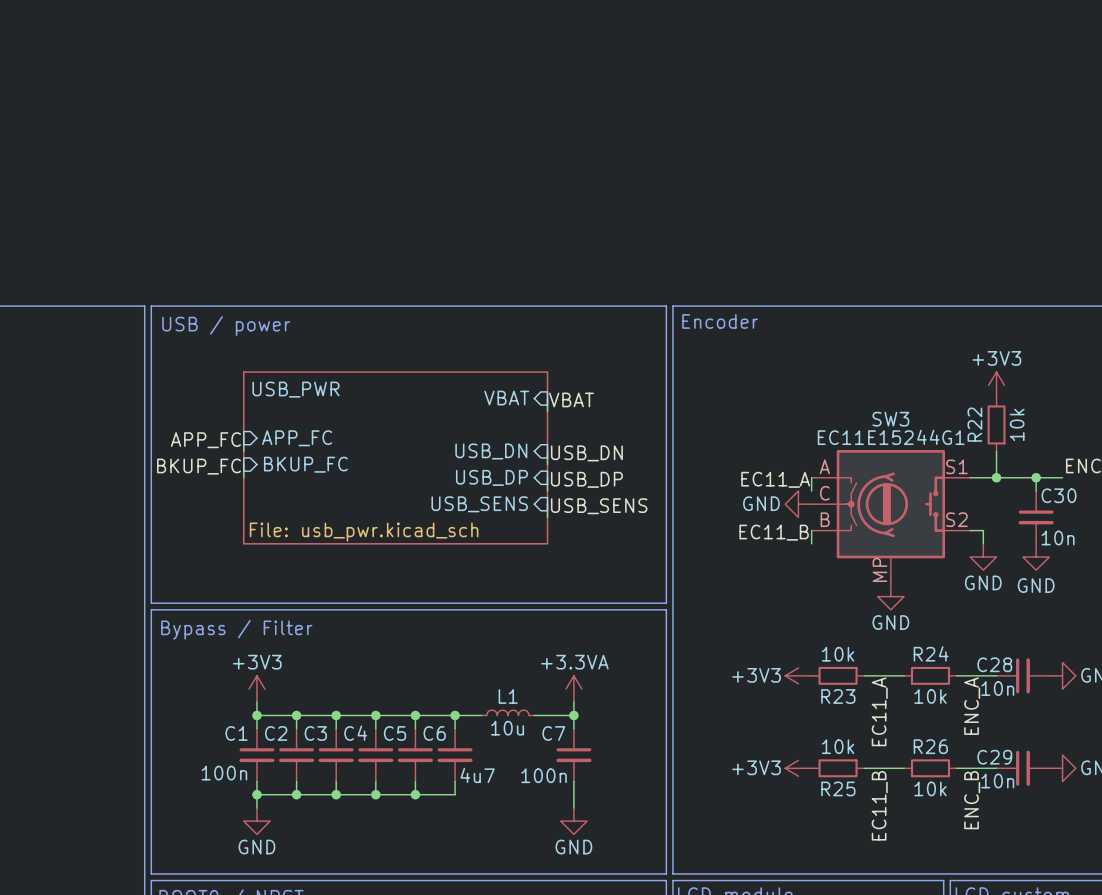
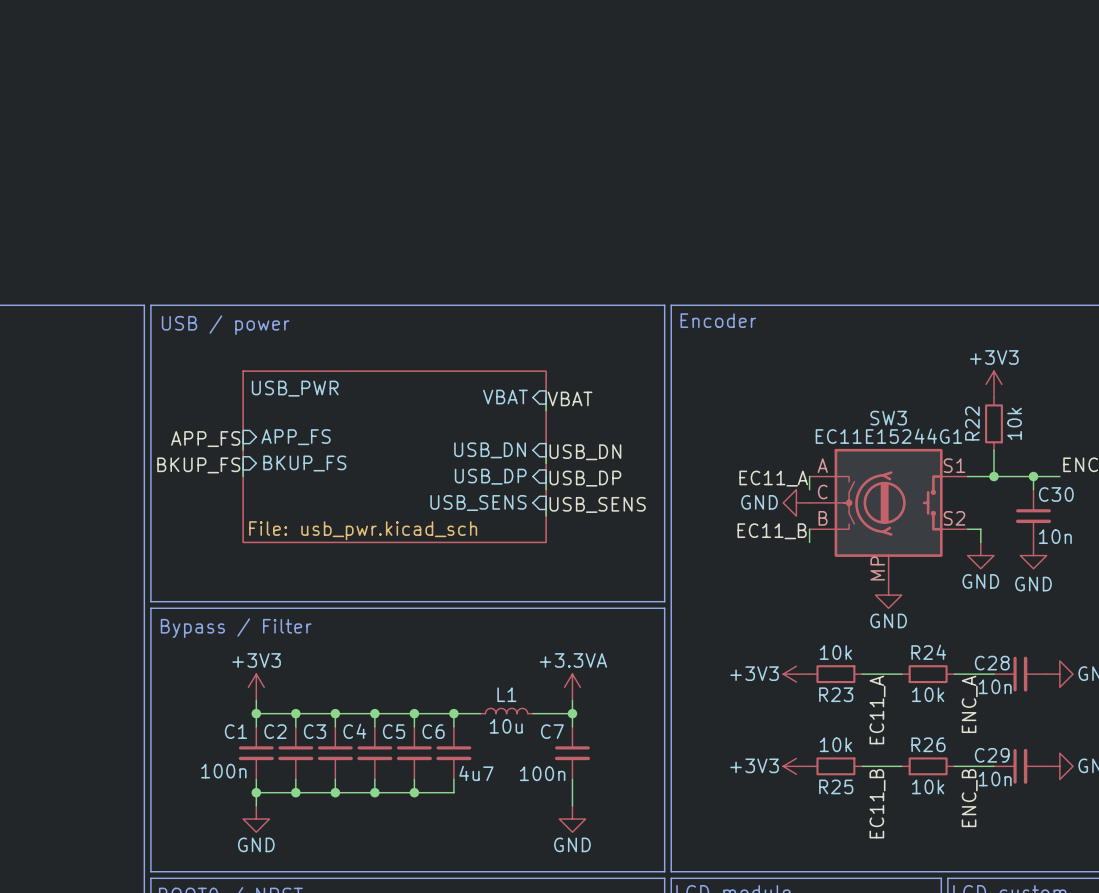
sheet pin: APP_FC (297, 438) -> APP_FS (296, 437)
label: APP_FC (205, 440) -> APP_FS (205, 439)
sheet pin: BKUP_FC (305, 464) -> BKUP_FS (304, 463)
label: BKUP_FC (199, 466) -> BKUP_FS (198, 465)

